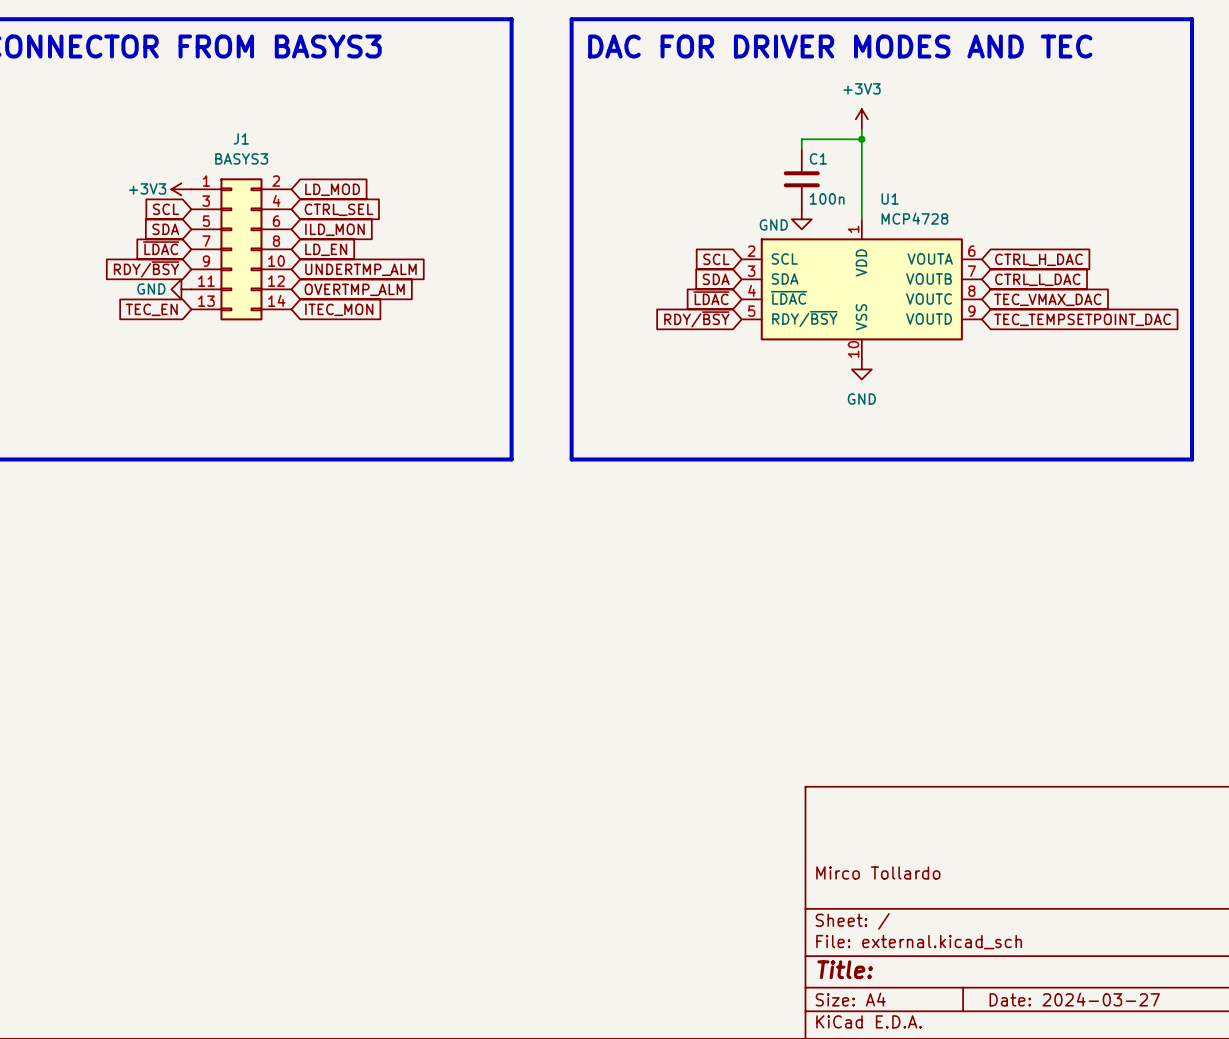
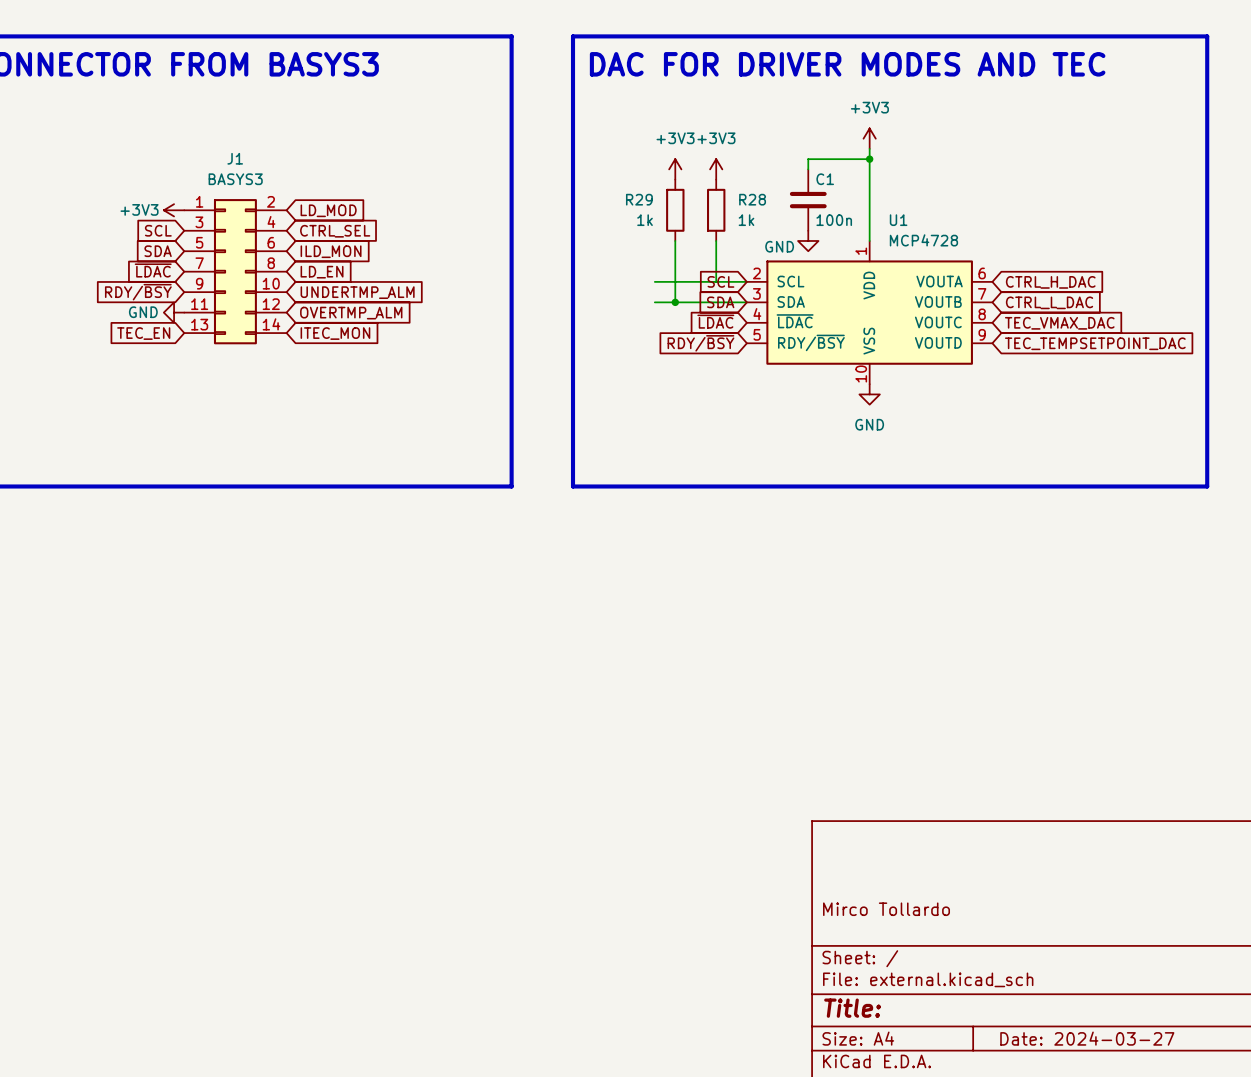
power symbol: none -> +3V3 (675, 169)
power symbol: none -> +3V3 (716, 169)
R29: none -> 1k (675, 210)
R28: none -> 1k (716, 210)
wire: none -> (675, 240) (675, 302)
wire: none -> (716, 240) (716, 281)
wire: none -> (654, 281) (746, 281)
wire: none -> (654, 302) (746, 302)
junction: none -> (675, 302)

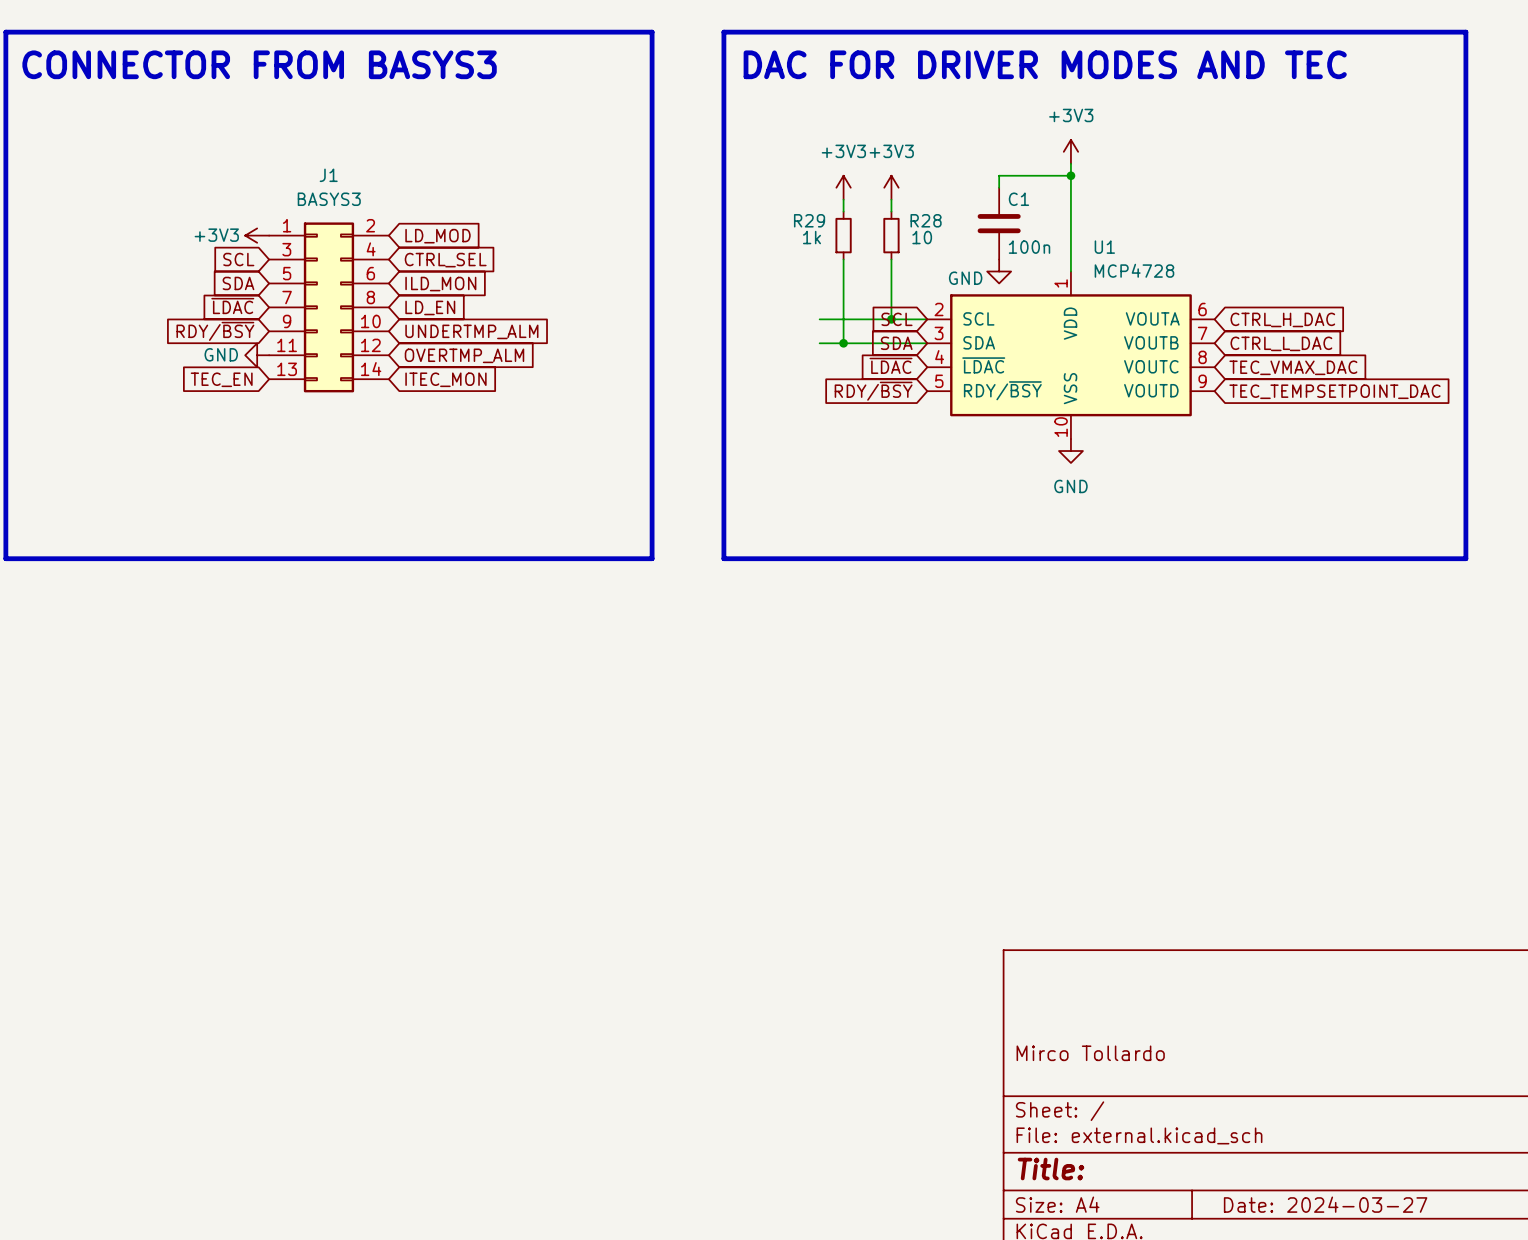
R29 symbol: [666, 179, 685, 241] -> [835, 211, 852, 260]
R28 symbol: [707, 179, 726, 241] -> [883, 211, 900, 260]
R28 value: 1k (746, 220) -> 10 (922, 237)
junction: none -> (891, 319)

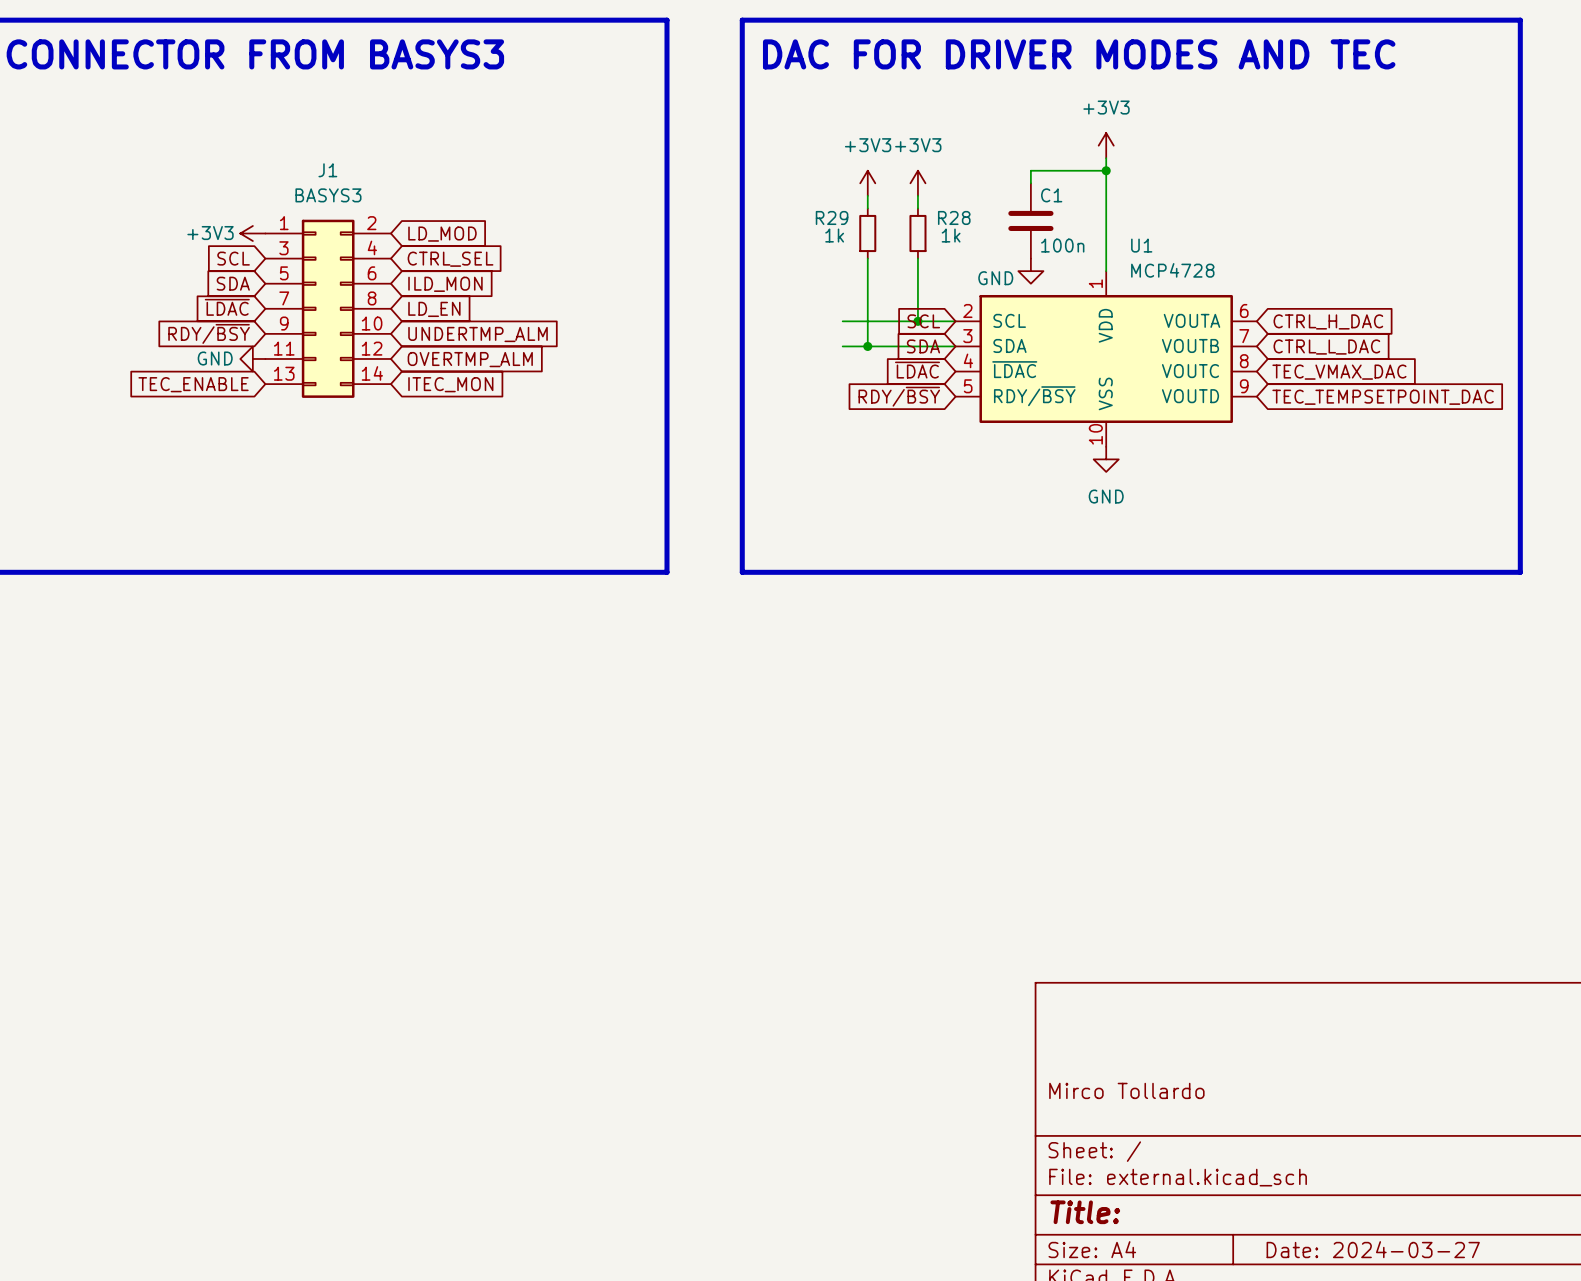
R28 value: 10 (922, 237) -> 1k (951, 235)
global label: TEC_EN (221, 379) -> TEC_ENABLE (193, 384)

